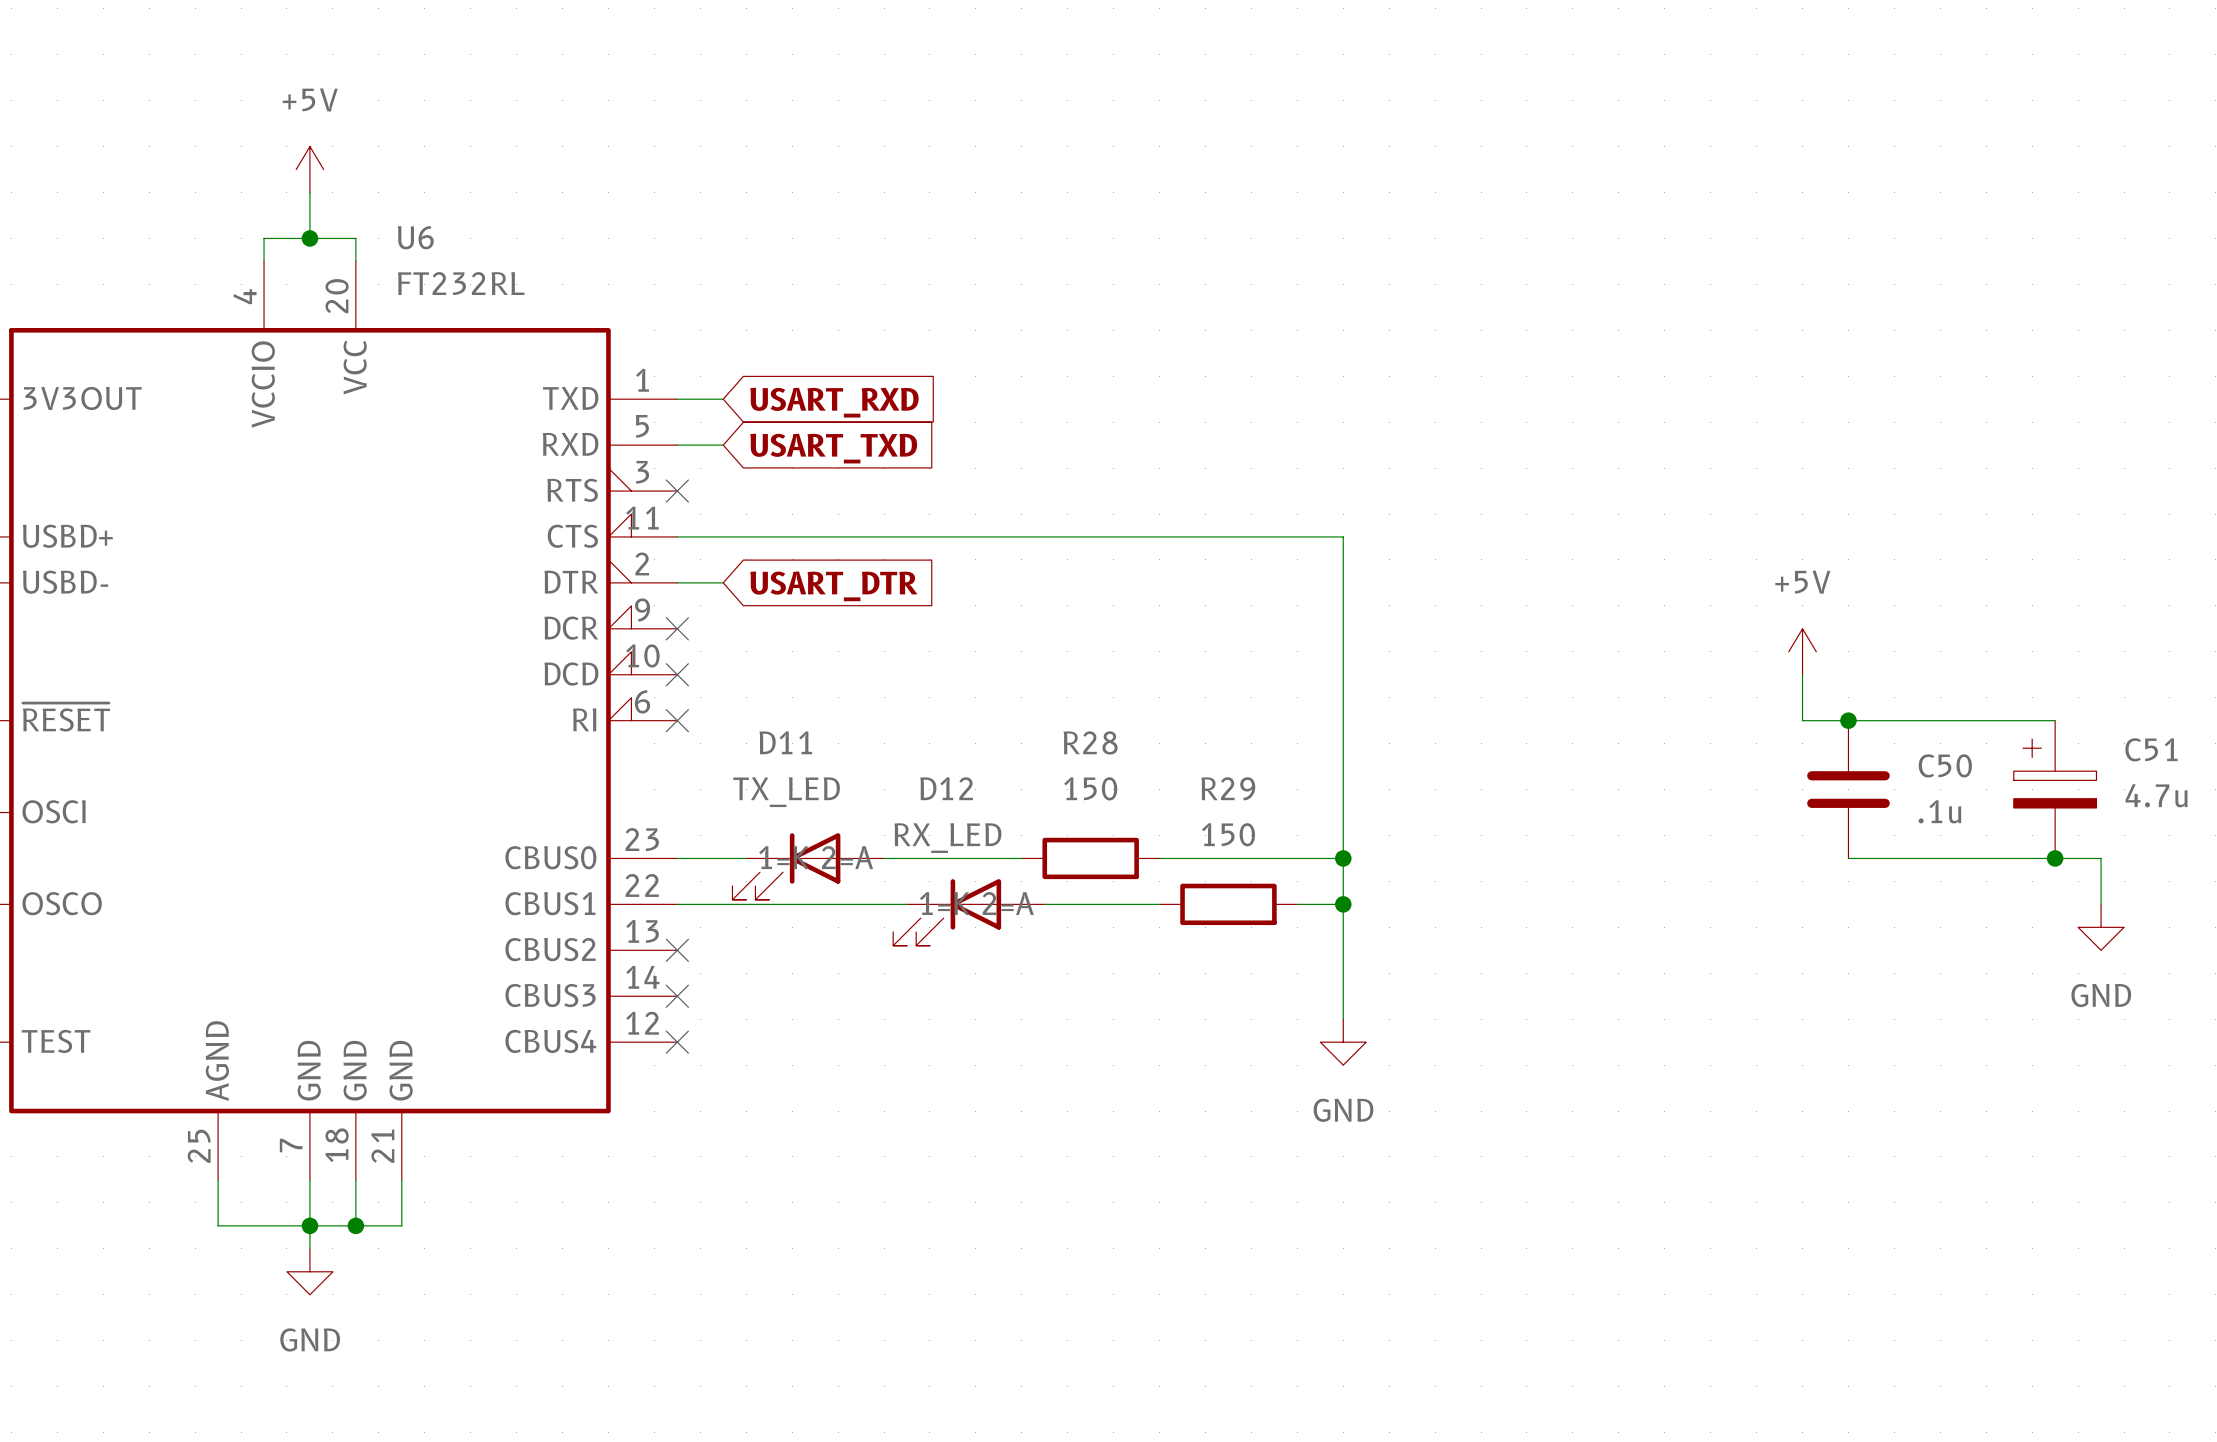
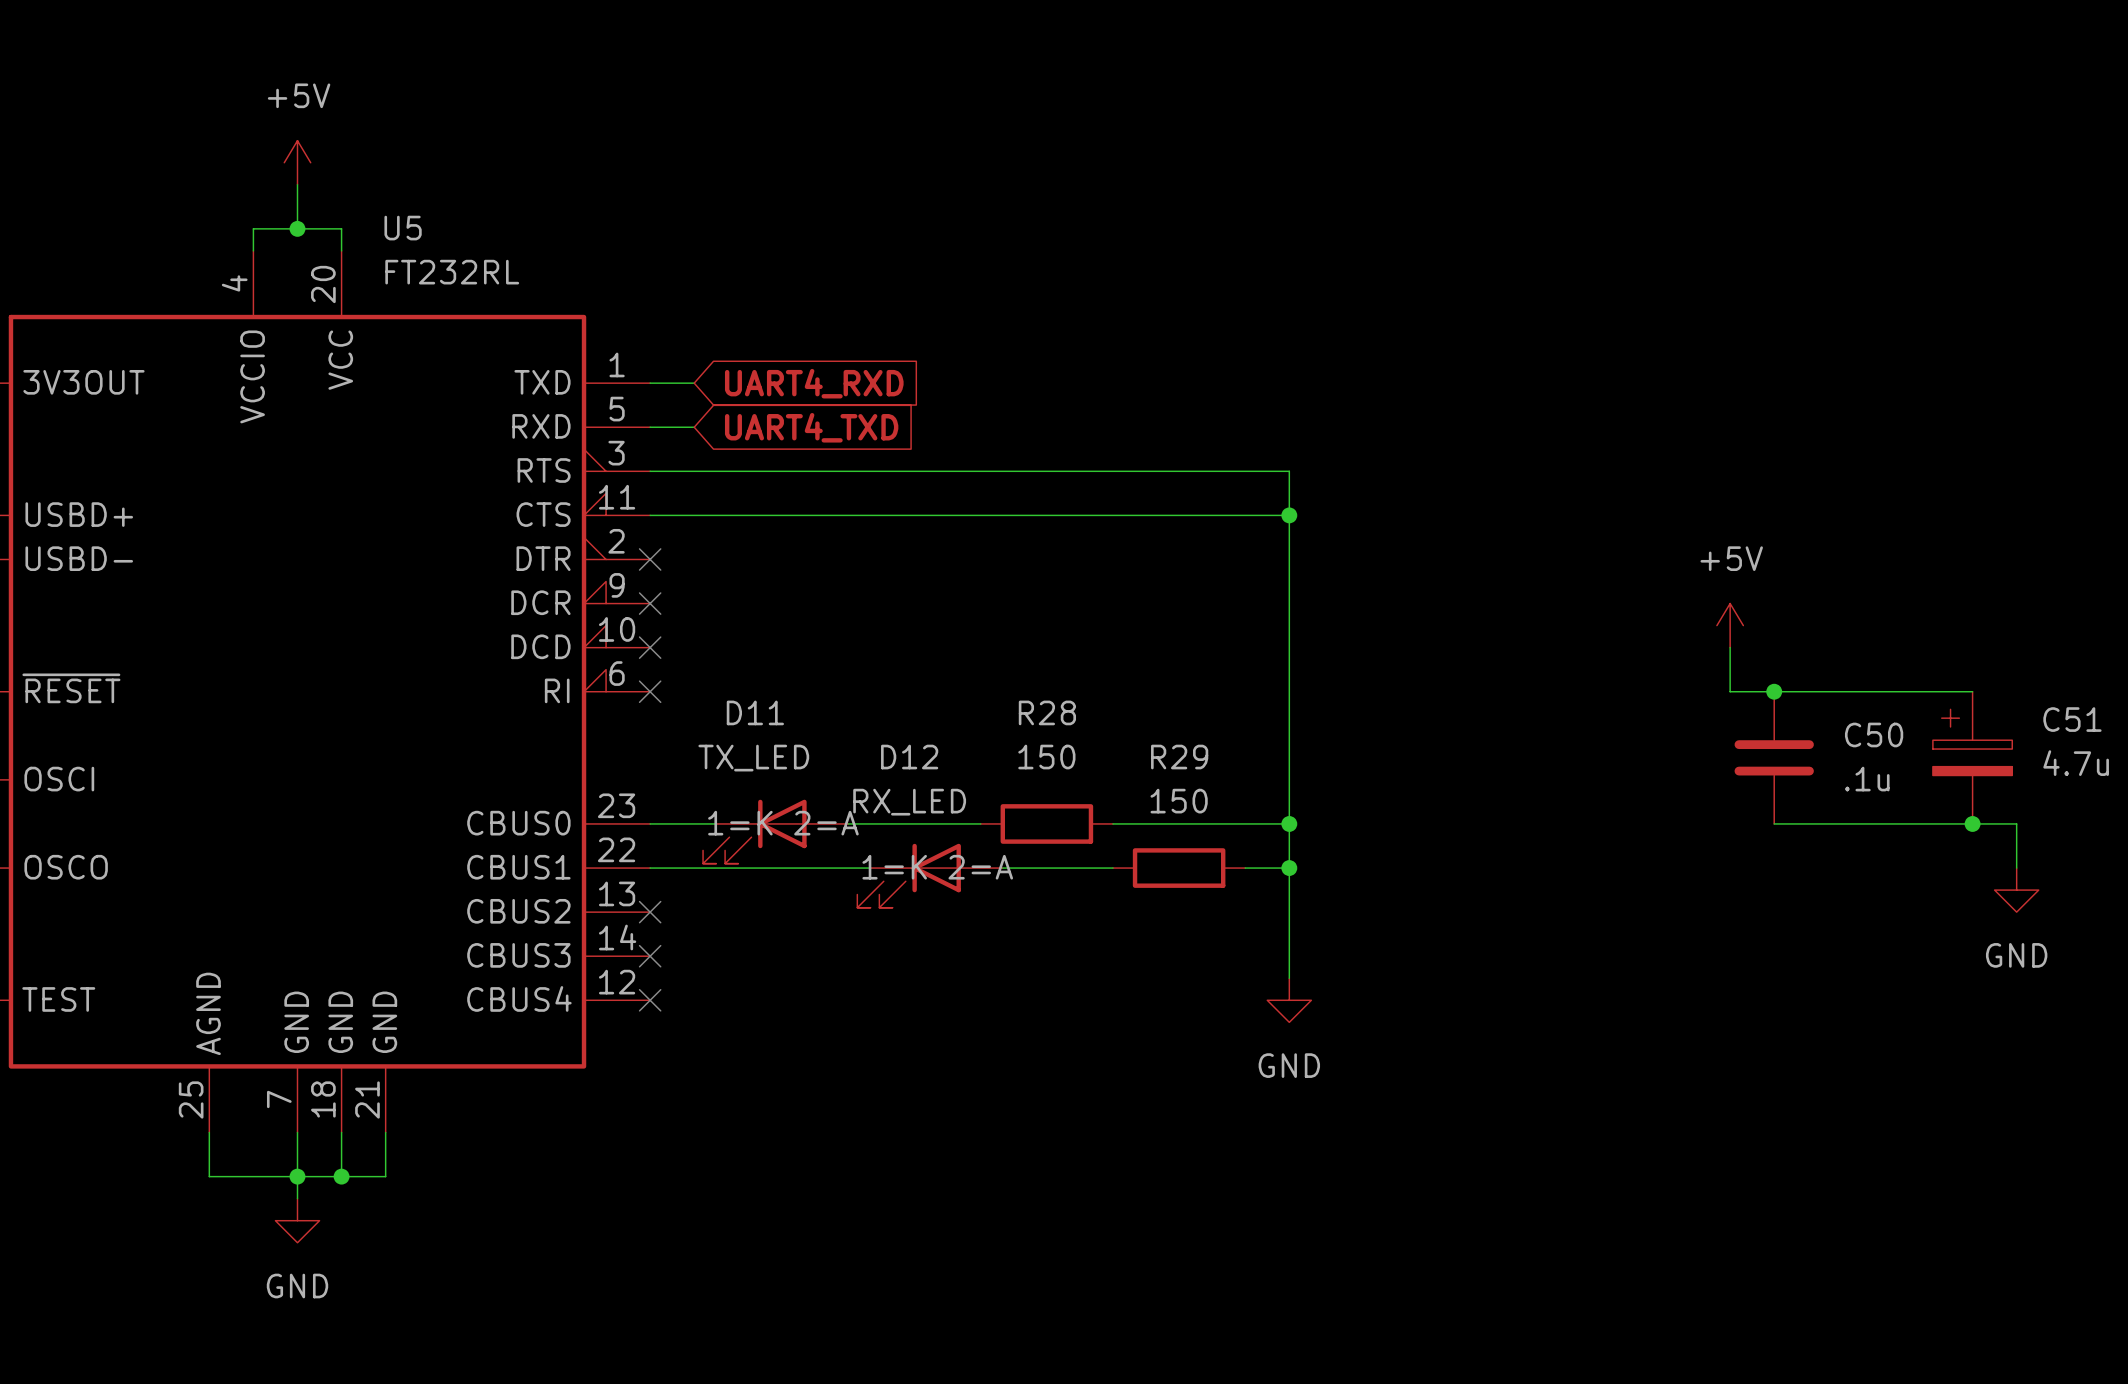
U6 name: U6 (415, 237) -> U5 (403, 228)
global label: USART_RXD (834, 402) -> UART4_RXD (814, 383)
global label: USART_TXD (833, 448) -> UART4_TXD (811, 427)
wire: none -> (650, 471) (1289, 471) (1289, 515)
no-connect mark position: (677, 491) -> (650, 559)
junction: none -> (1289, 515)
wire: (677, 582) (723, 582) -> none
global label: USART_DTR (833, 586) -> none

